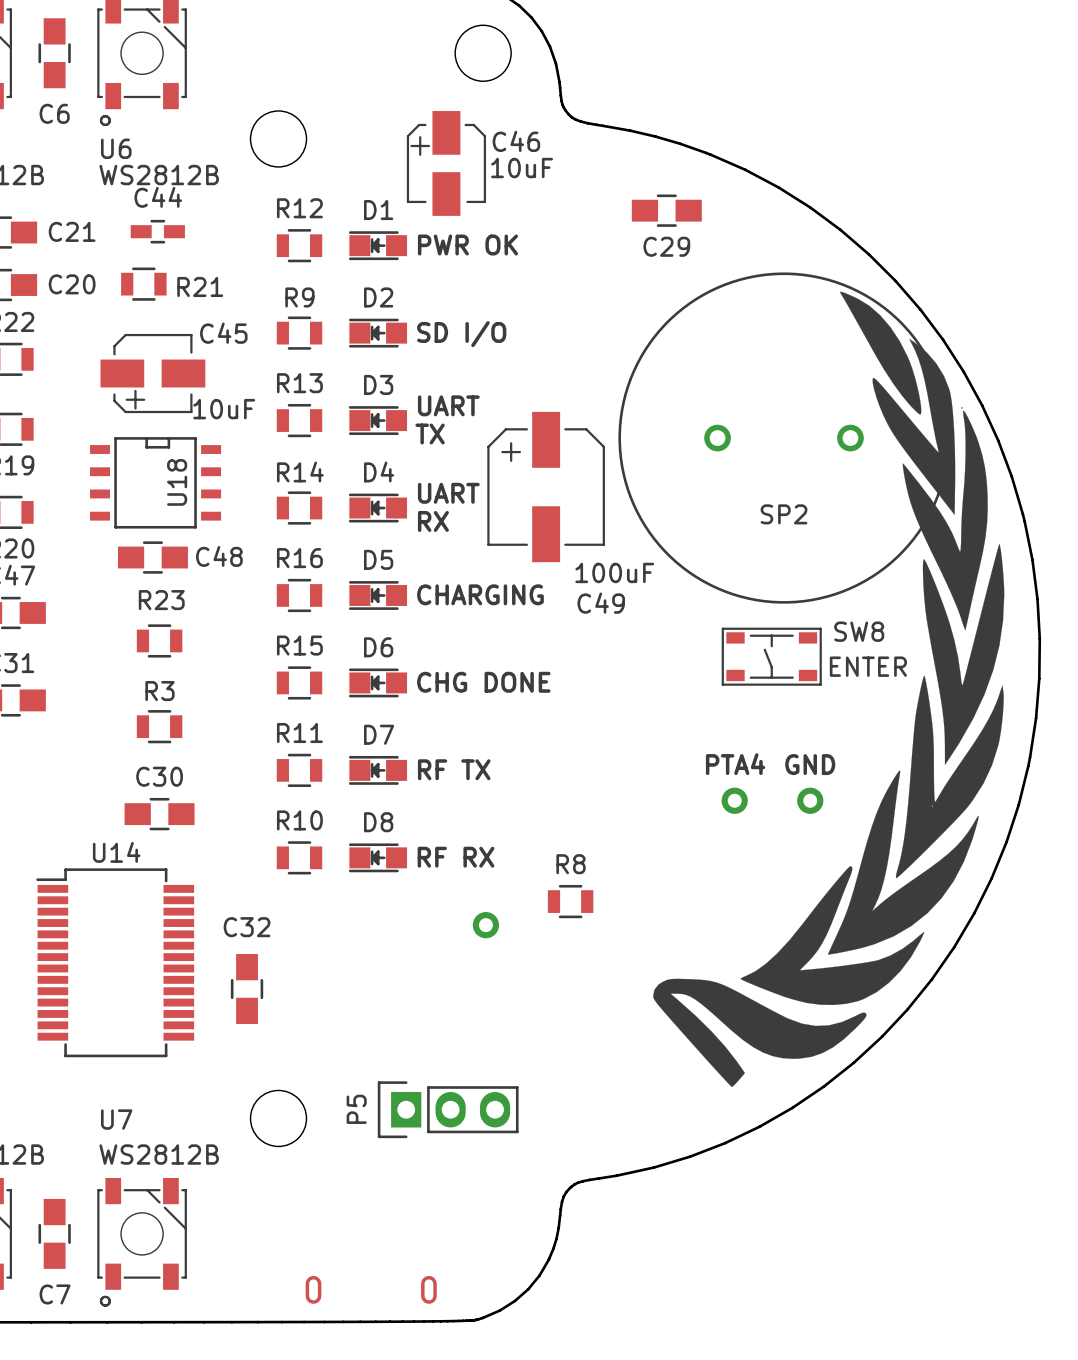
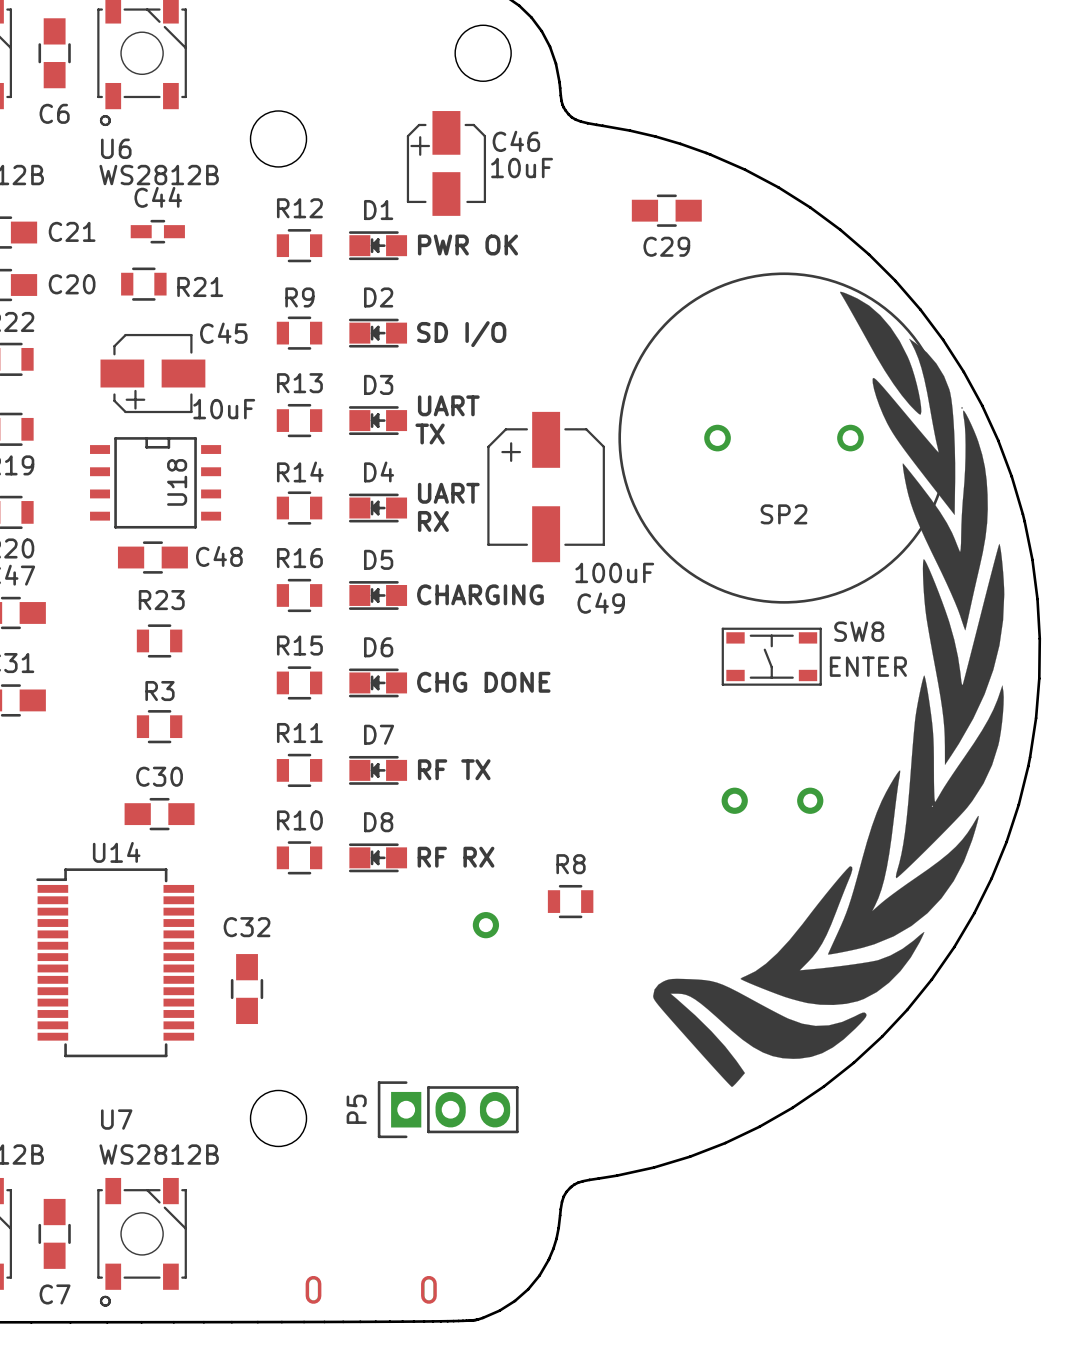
text: PTA4 (735, 764) -> none
text: GND (810, 764) -> none

